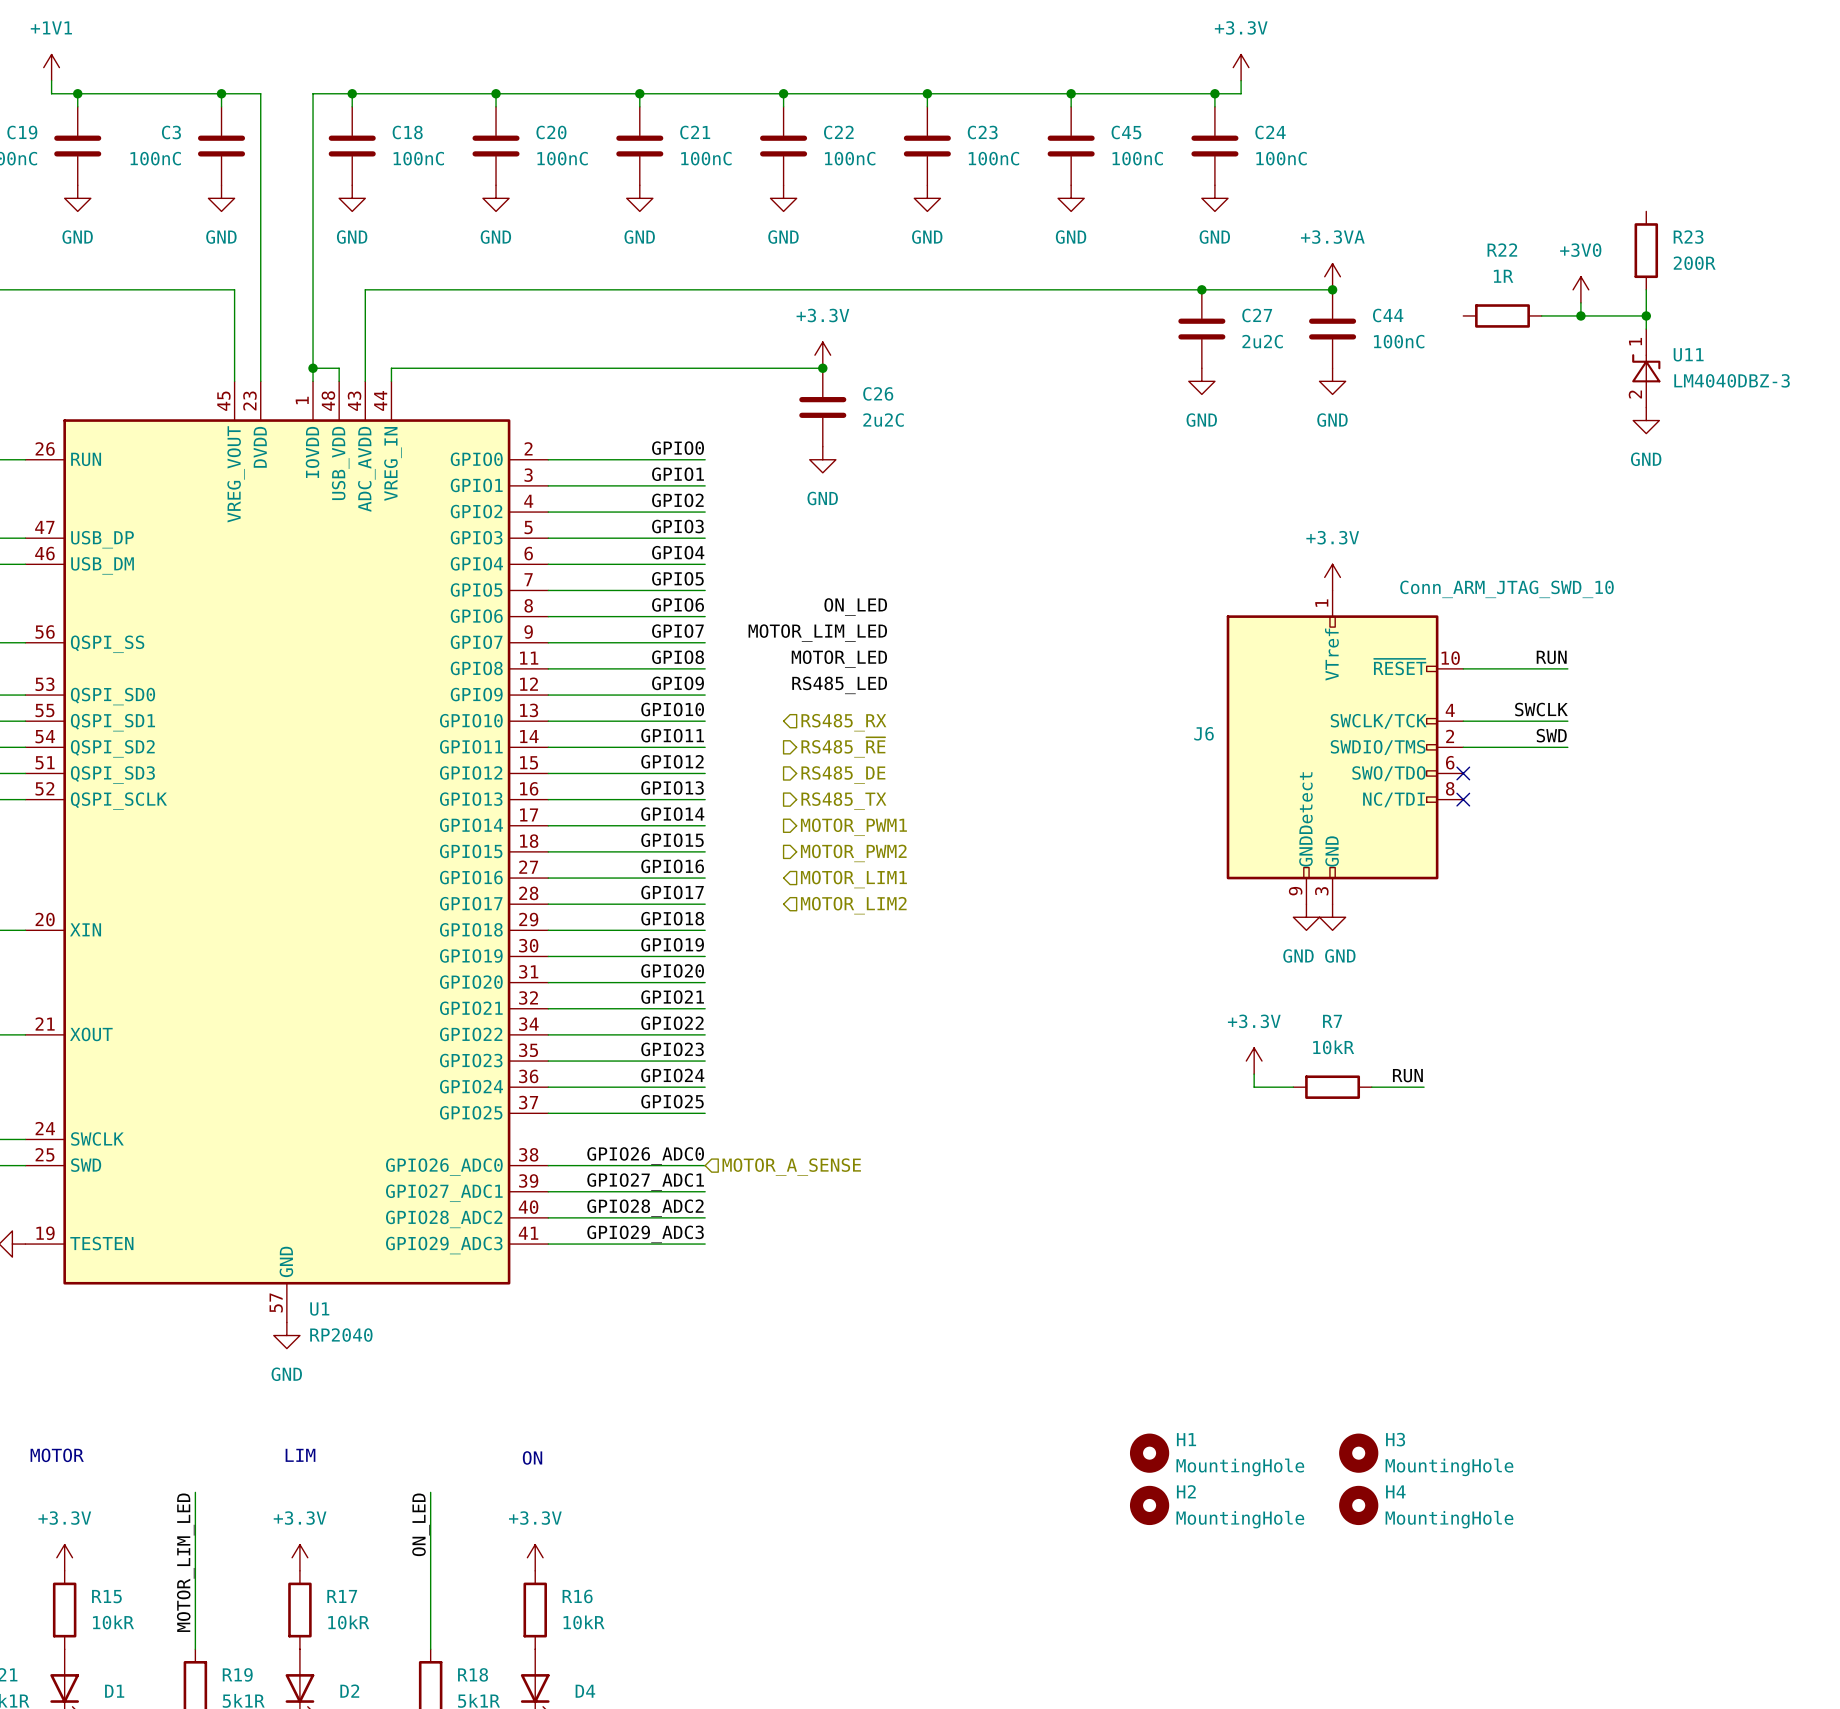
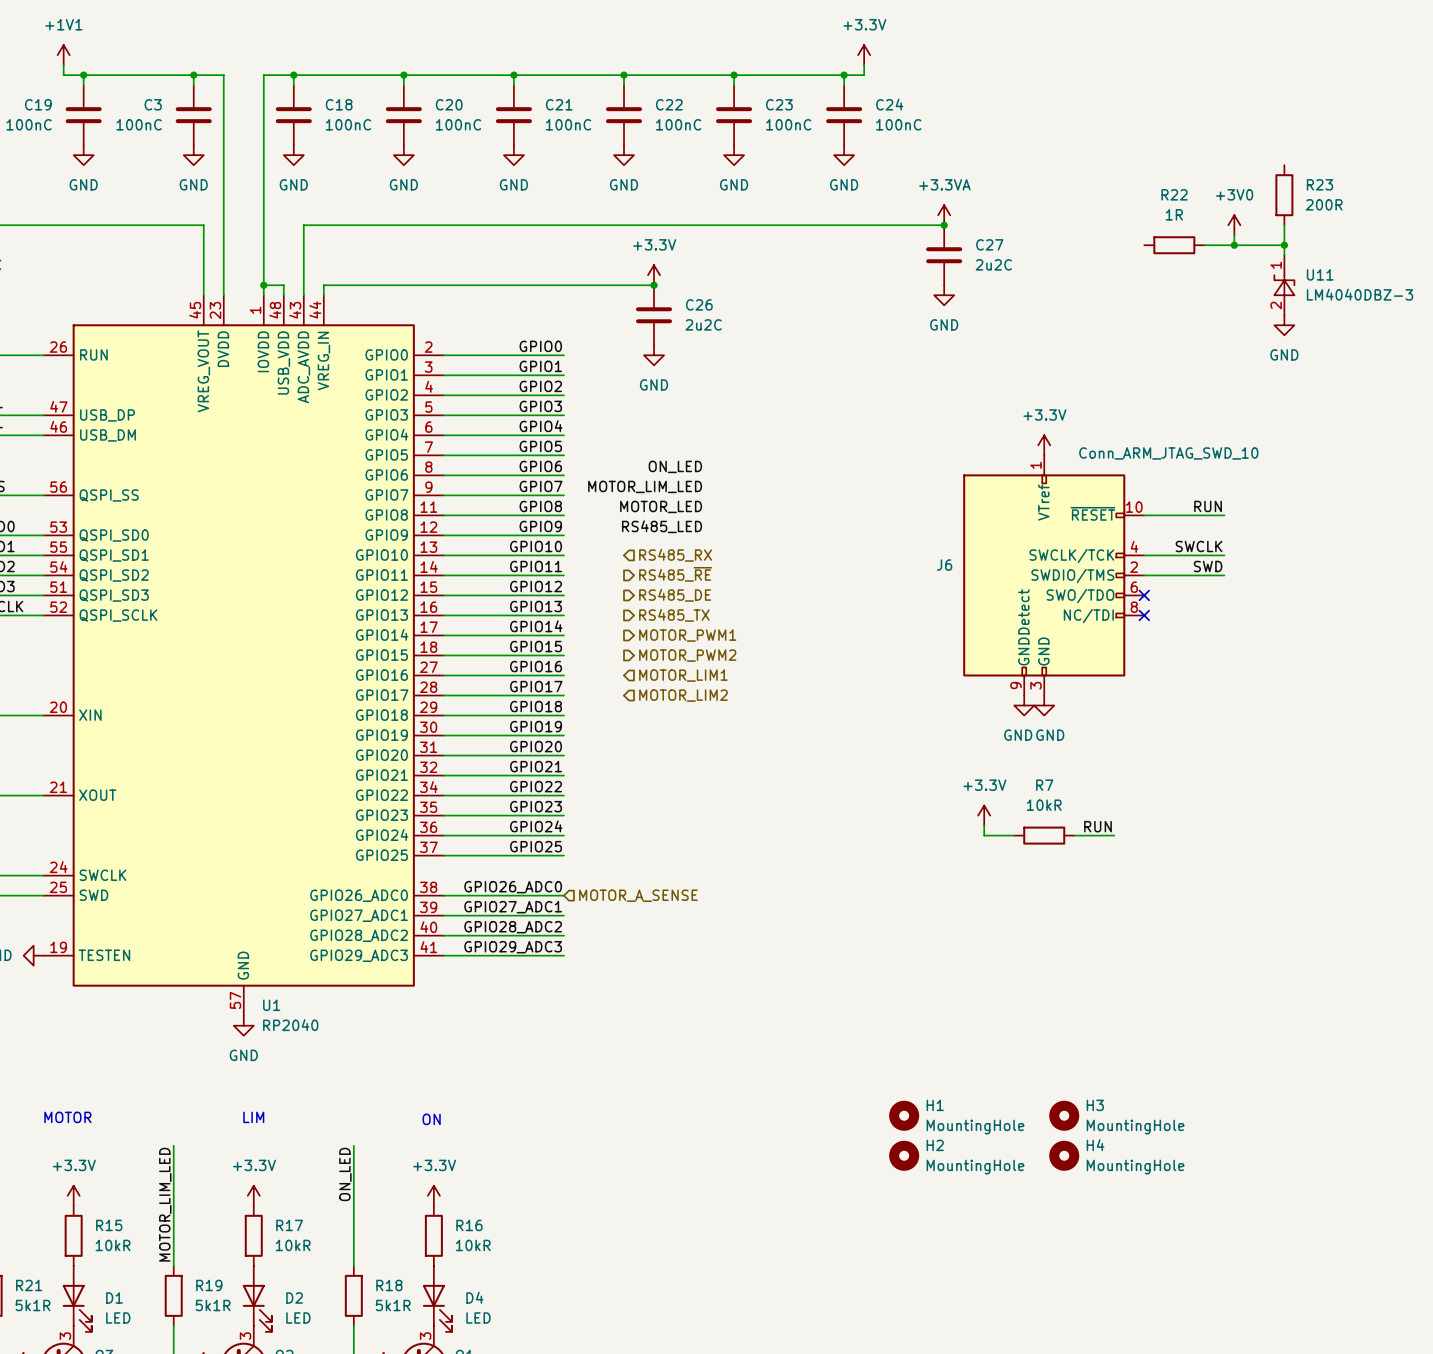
power symbol position: +3.3V (1241, 67) -> +3.3V (864, 55)
wire: (1241, 80) (1241, 93) (1097, 93) -> (864, 65) (864, 75)
wire: (1214, 93) (1214, 106) -> none
junction: (1214, 93) -> none
C45 name: C45 (1126, 132) -> C24 (889, 104)
C24: 100nC (1214, 146) -> none
power symbol: GND (1214, 198) -> none
power symbol position: +3.3VA (1332, 276) -> +3.3VA (944, 215)
wire: (1201, 289) (1332, 289) -> none
junction: (1332, 289) -> none
C44: 100nC (1332, 329) -> none
power symbol: GND (1332, 381) -> none

